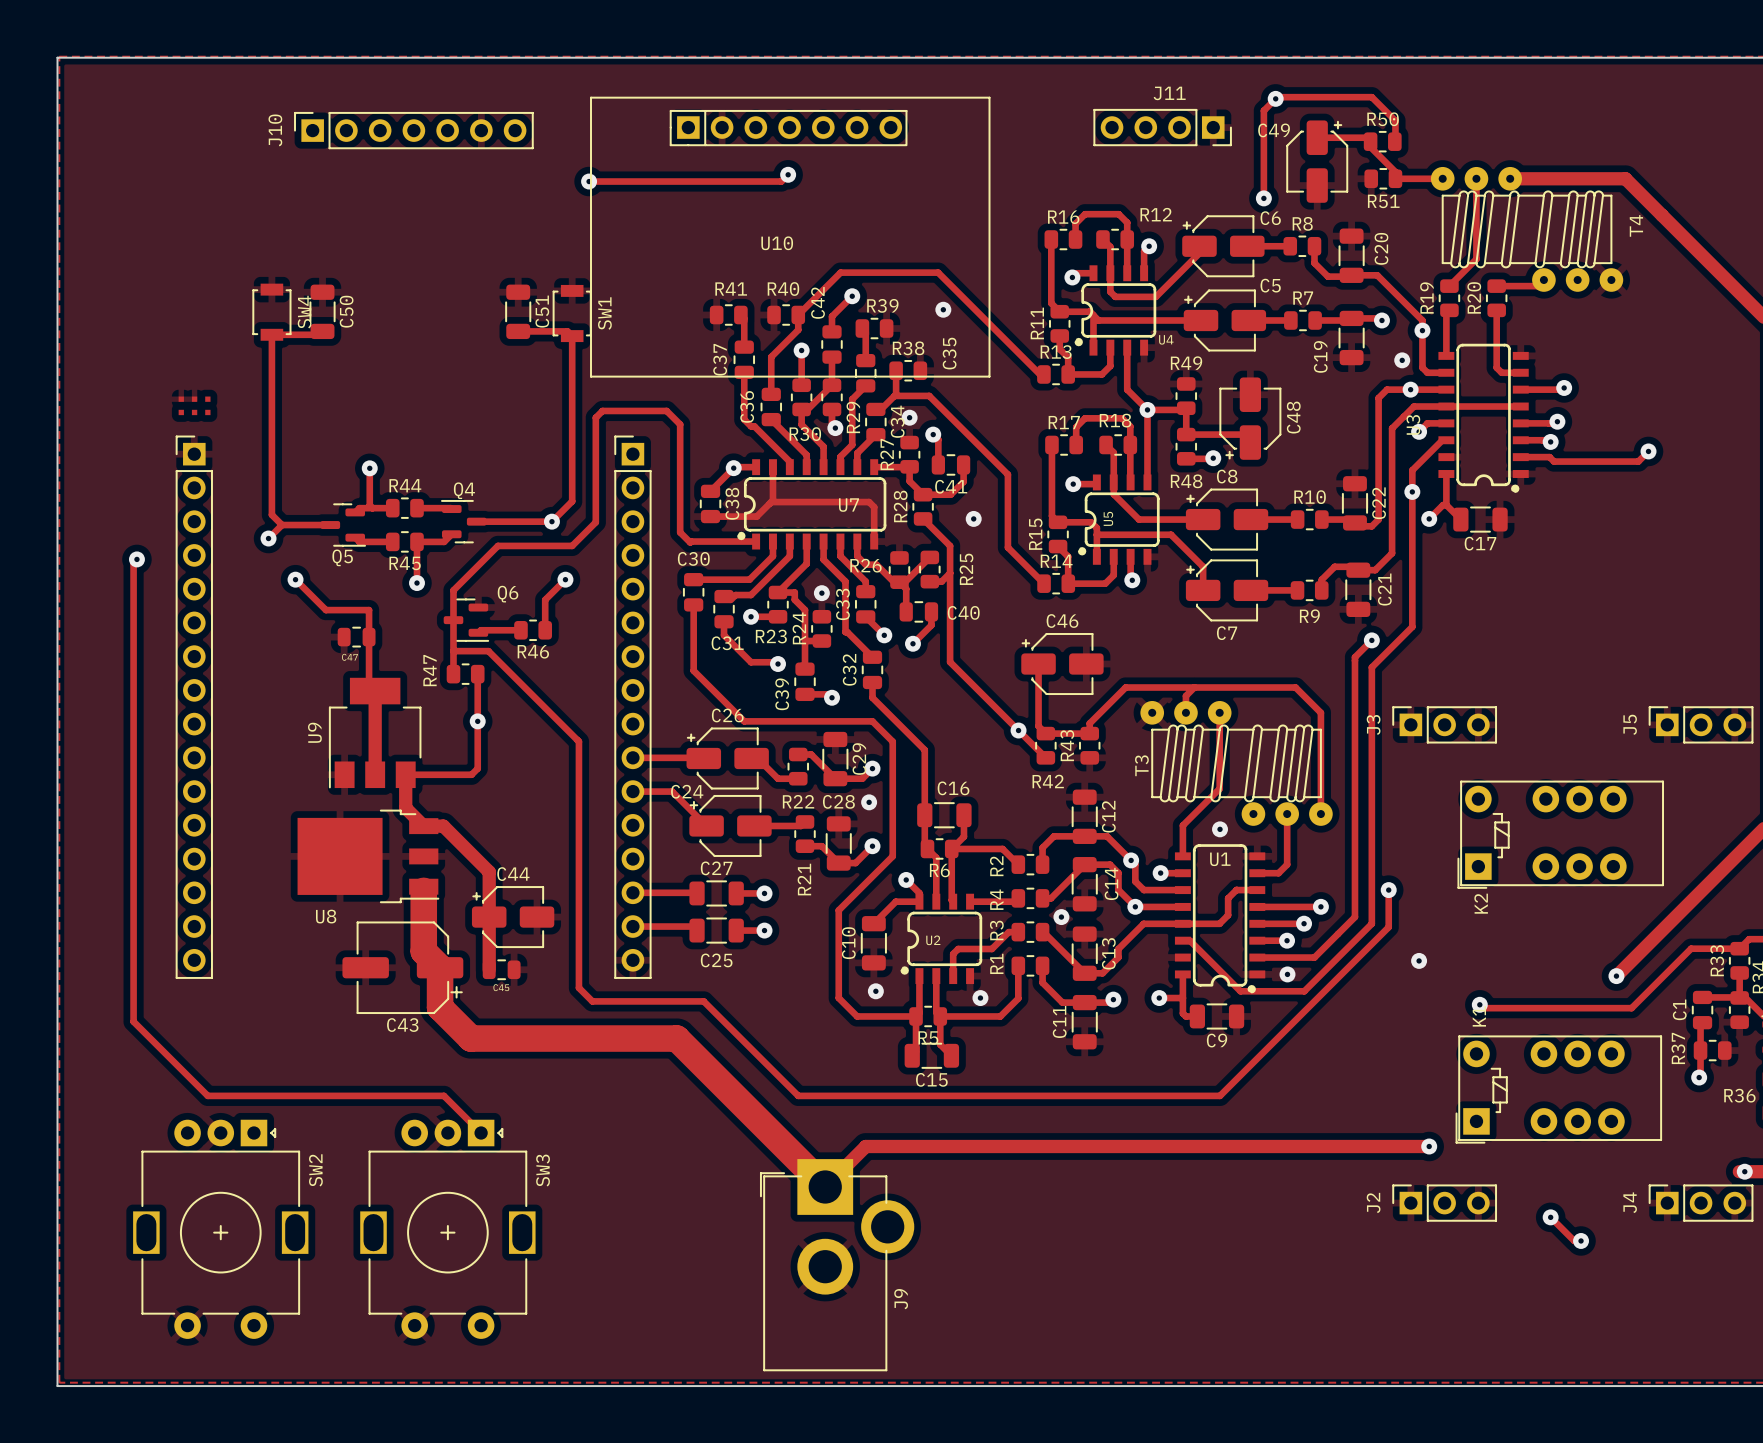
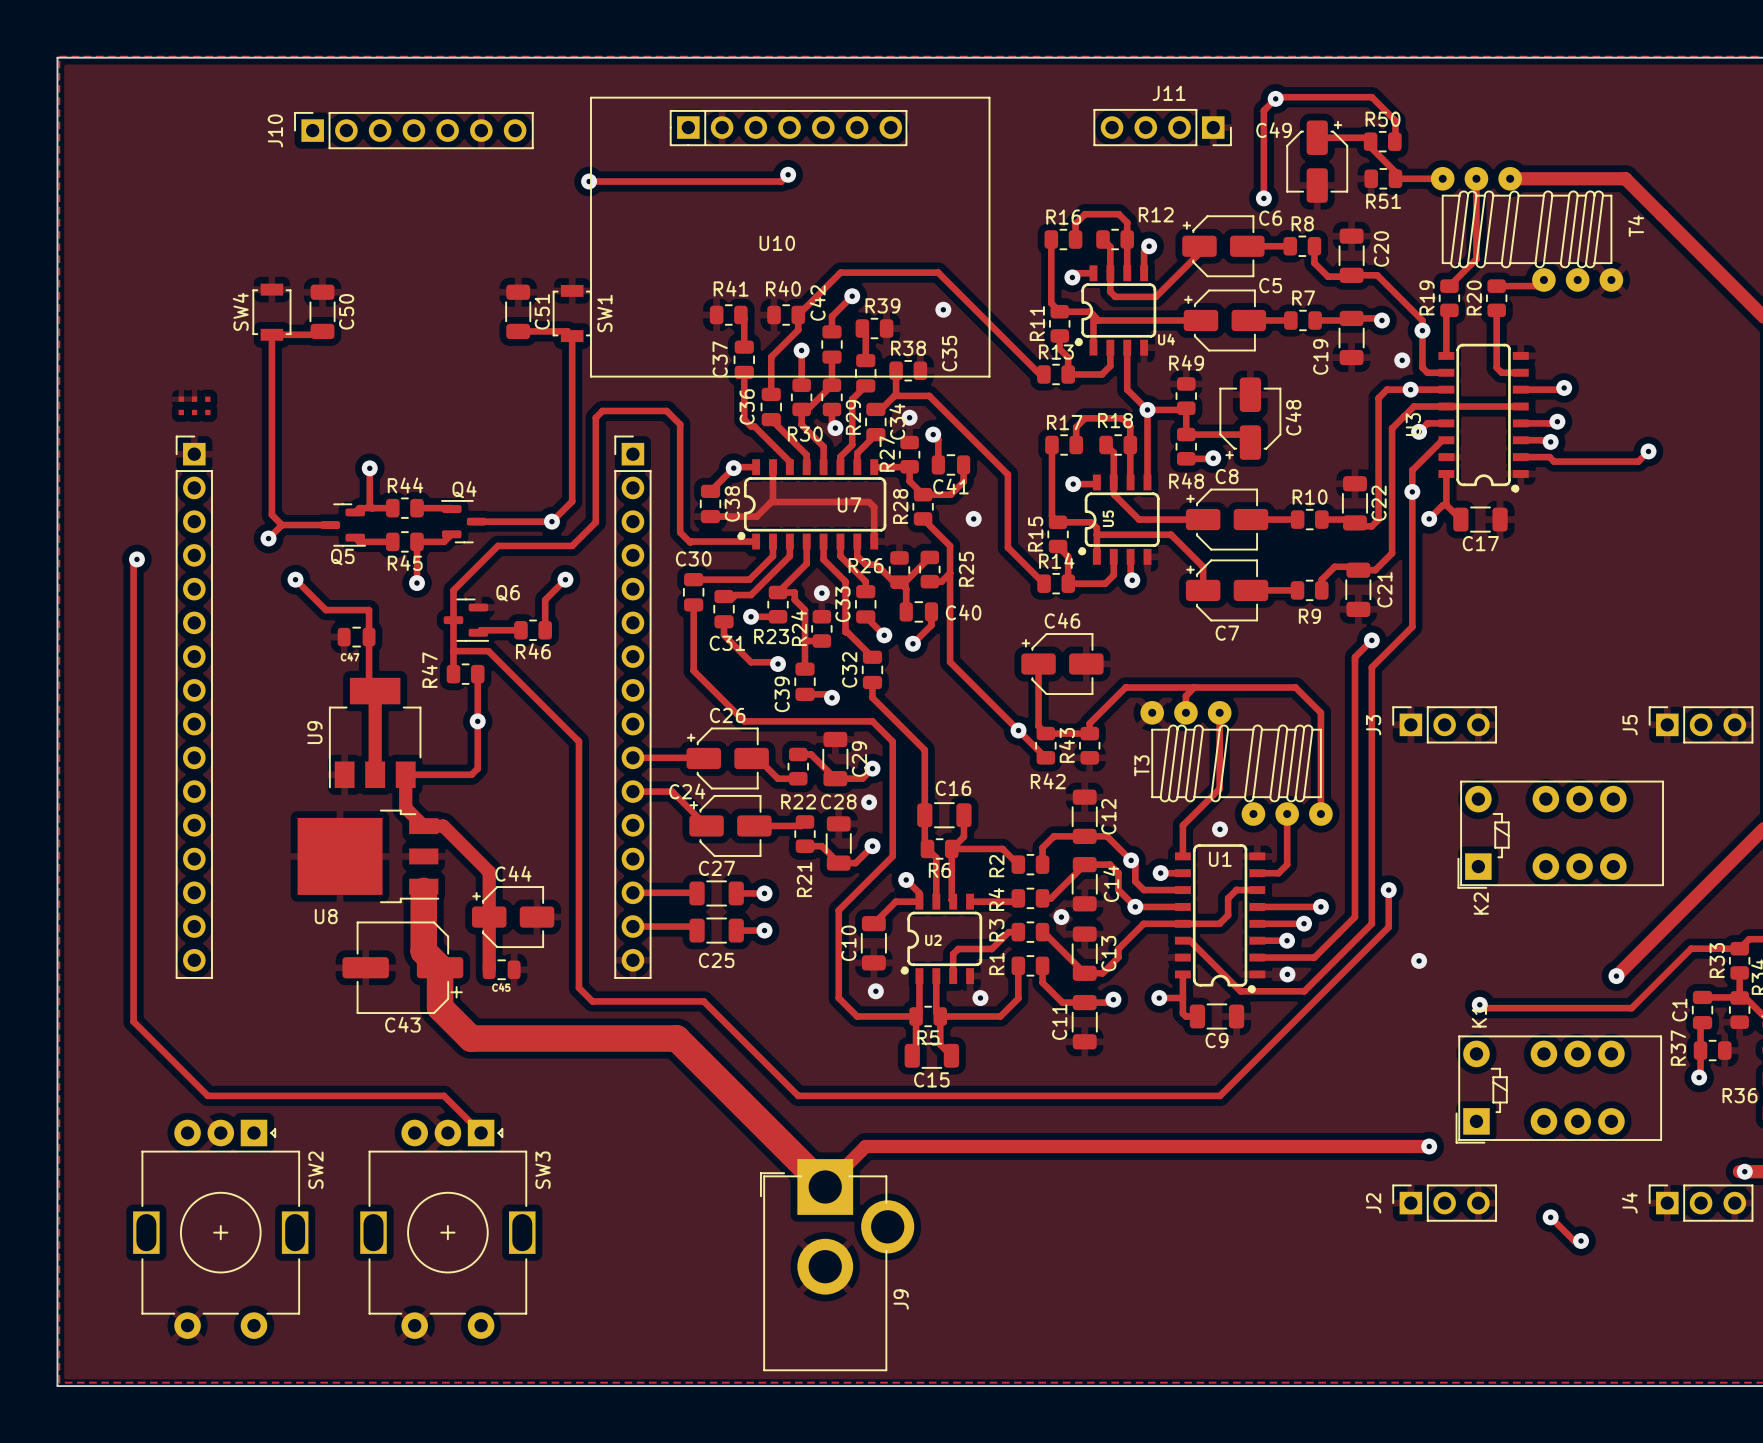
SW4 name position: SW4 (304, 312) -> SW4 (240, 311)

